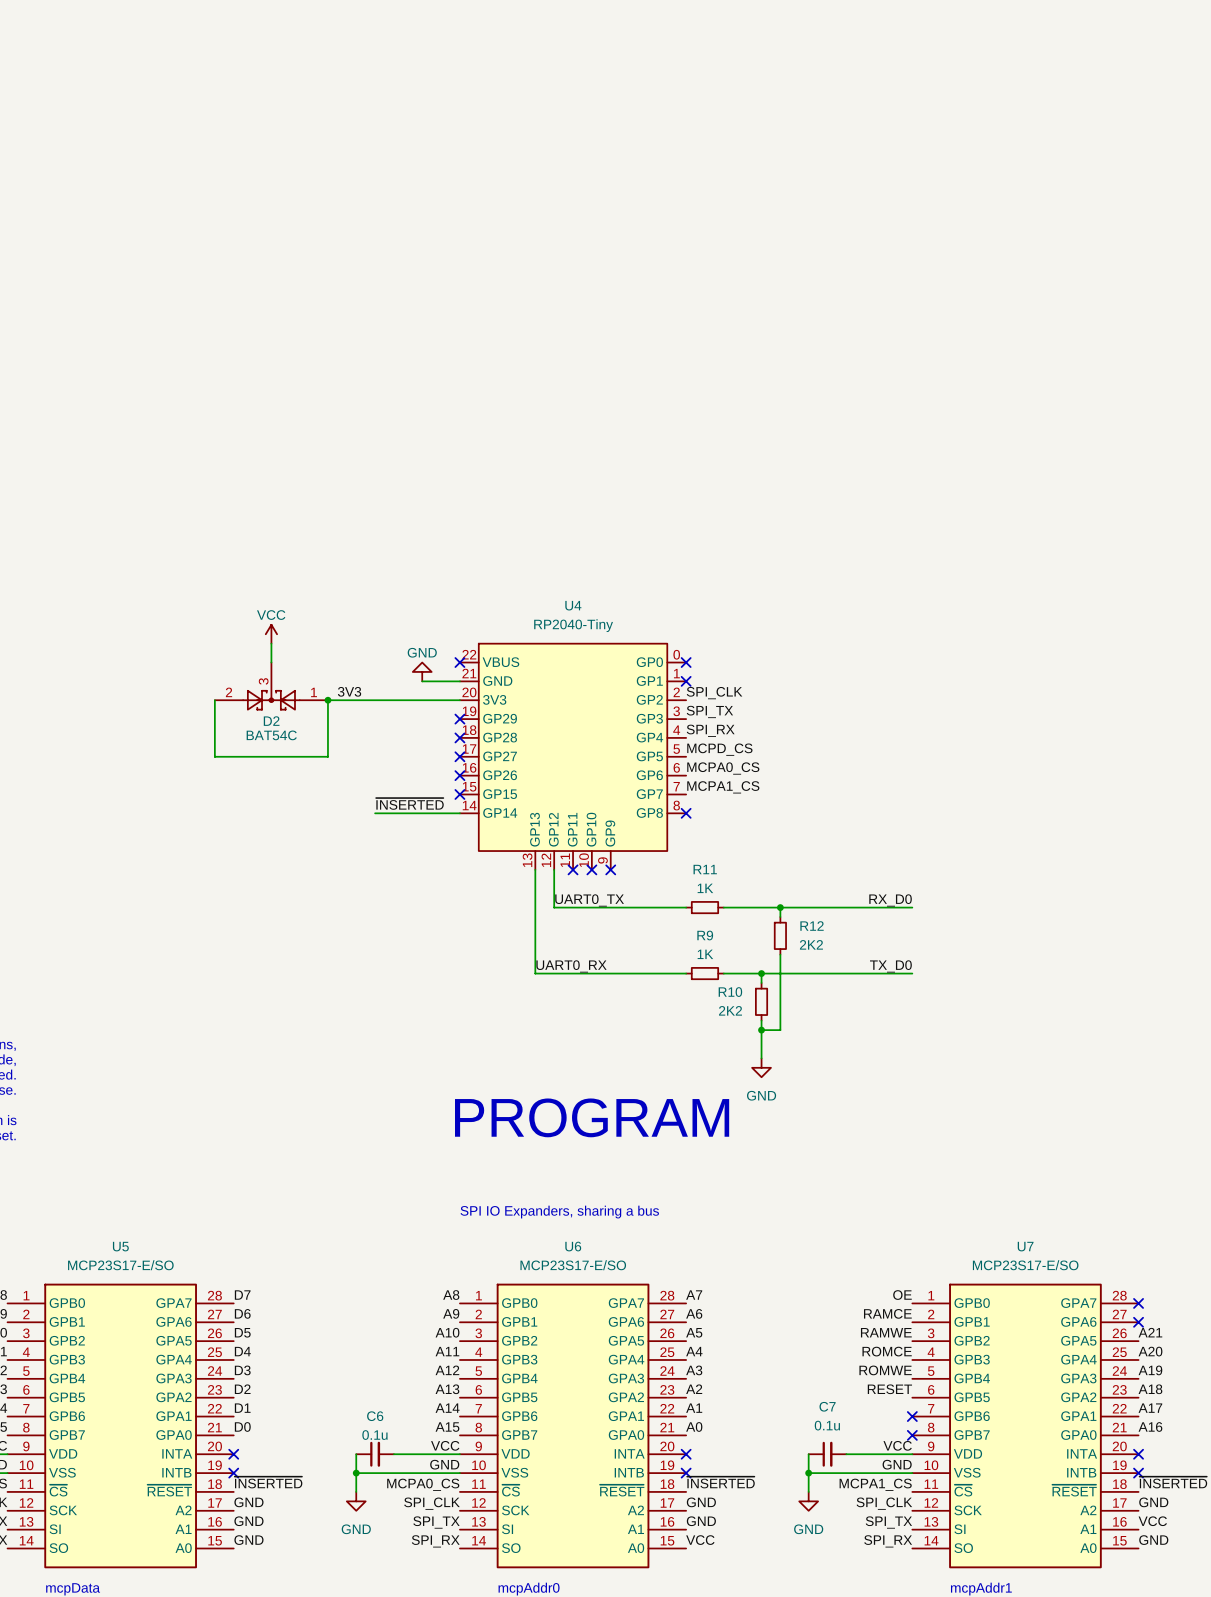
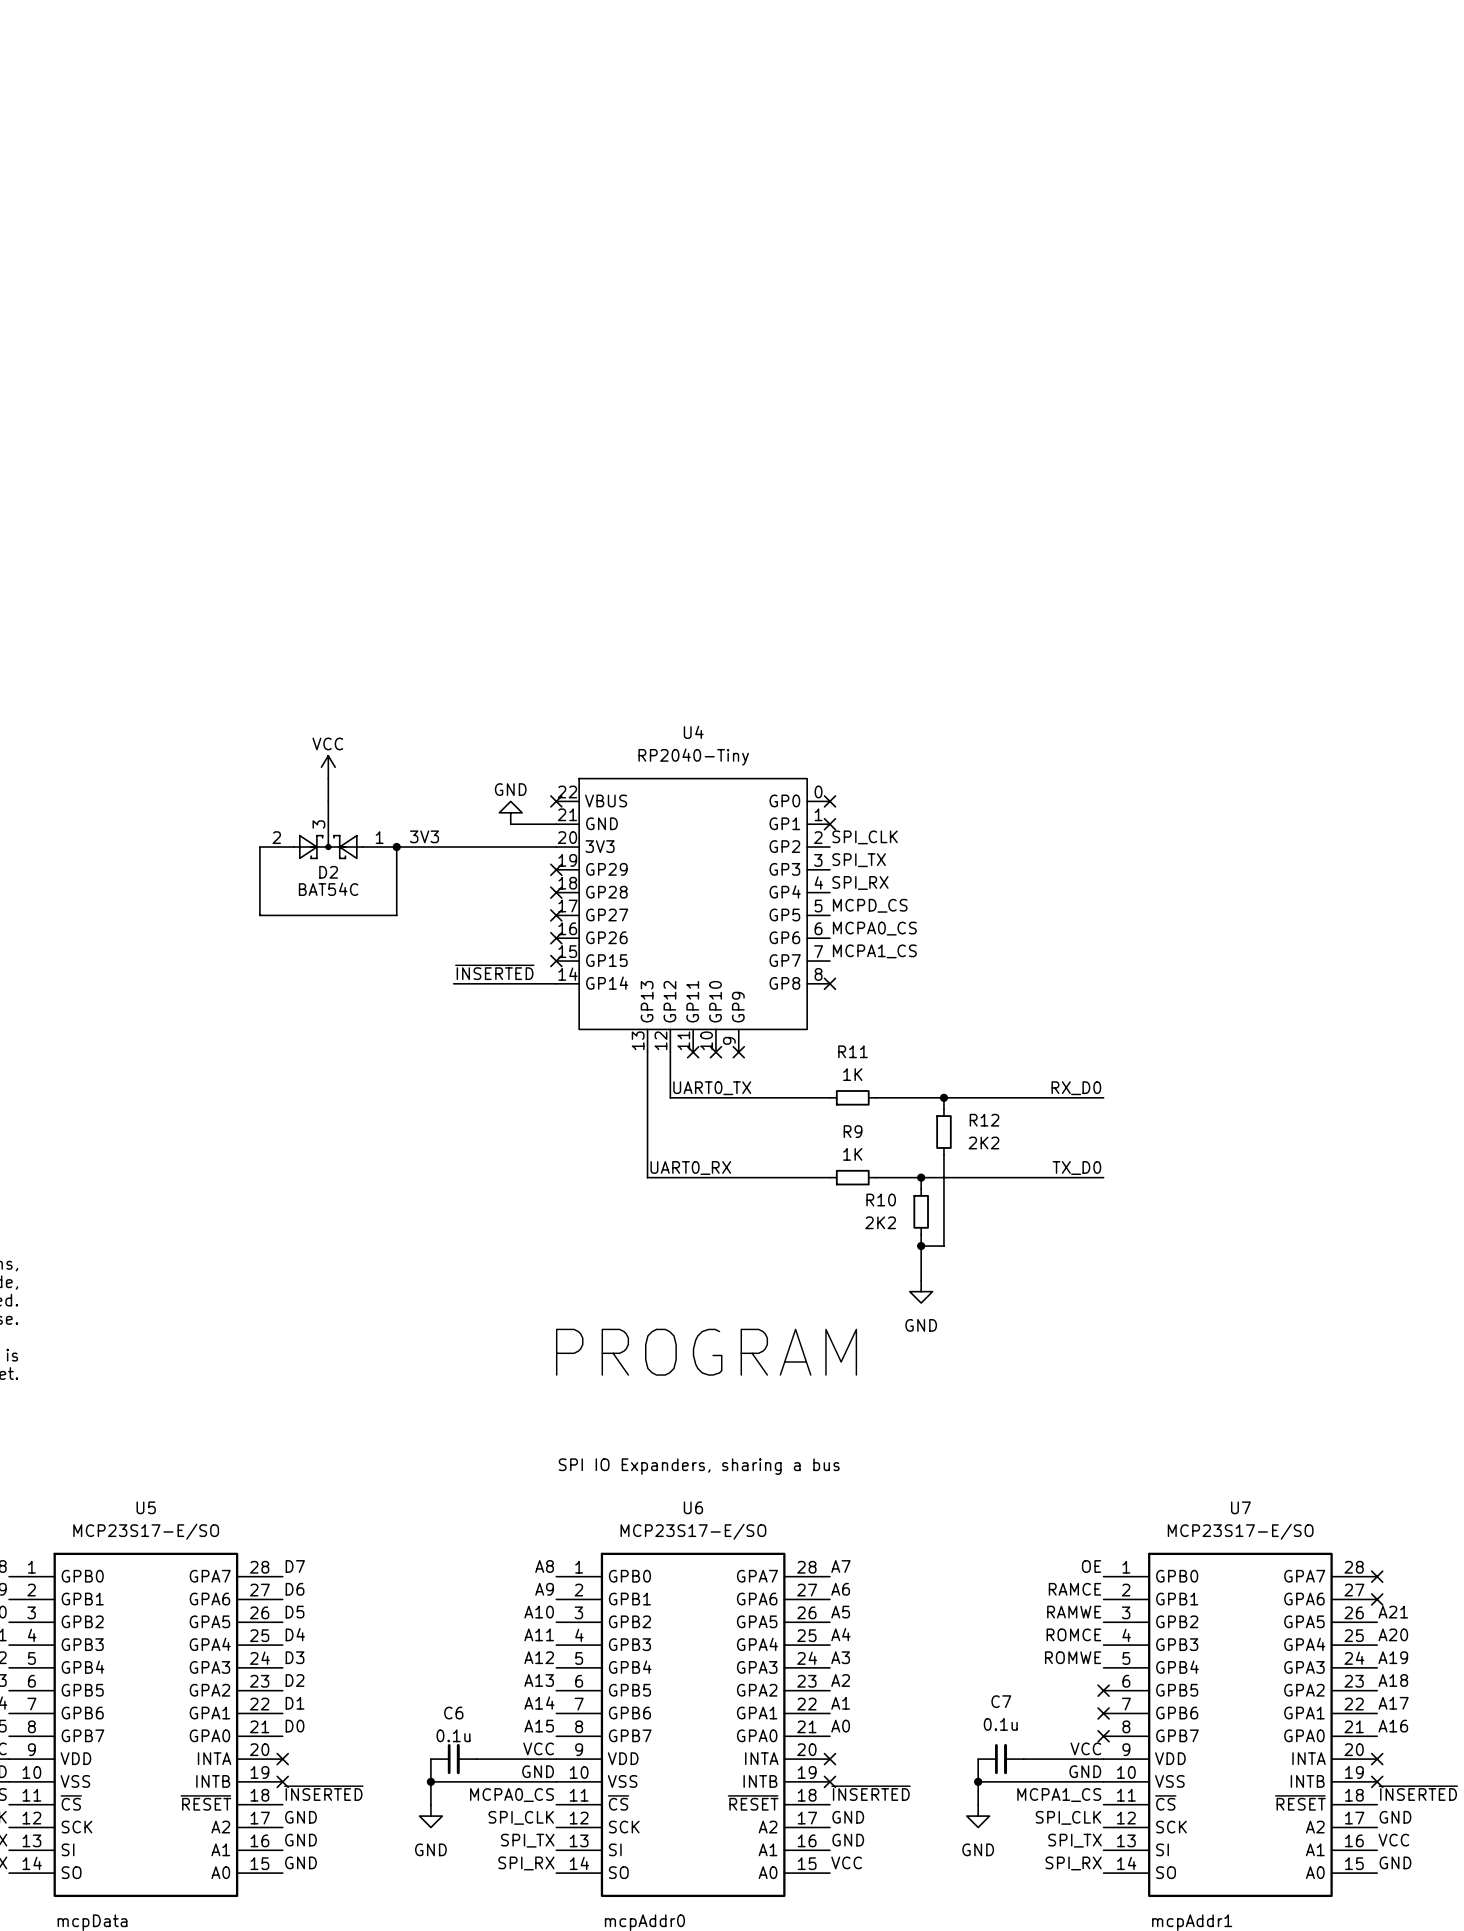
label: RESET (889, 1389) -> none
no-connect mark: none -> (1103, 1690)

